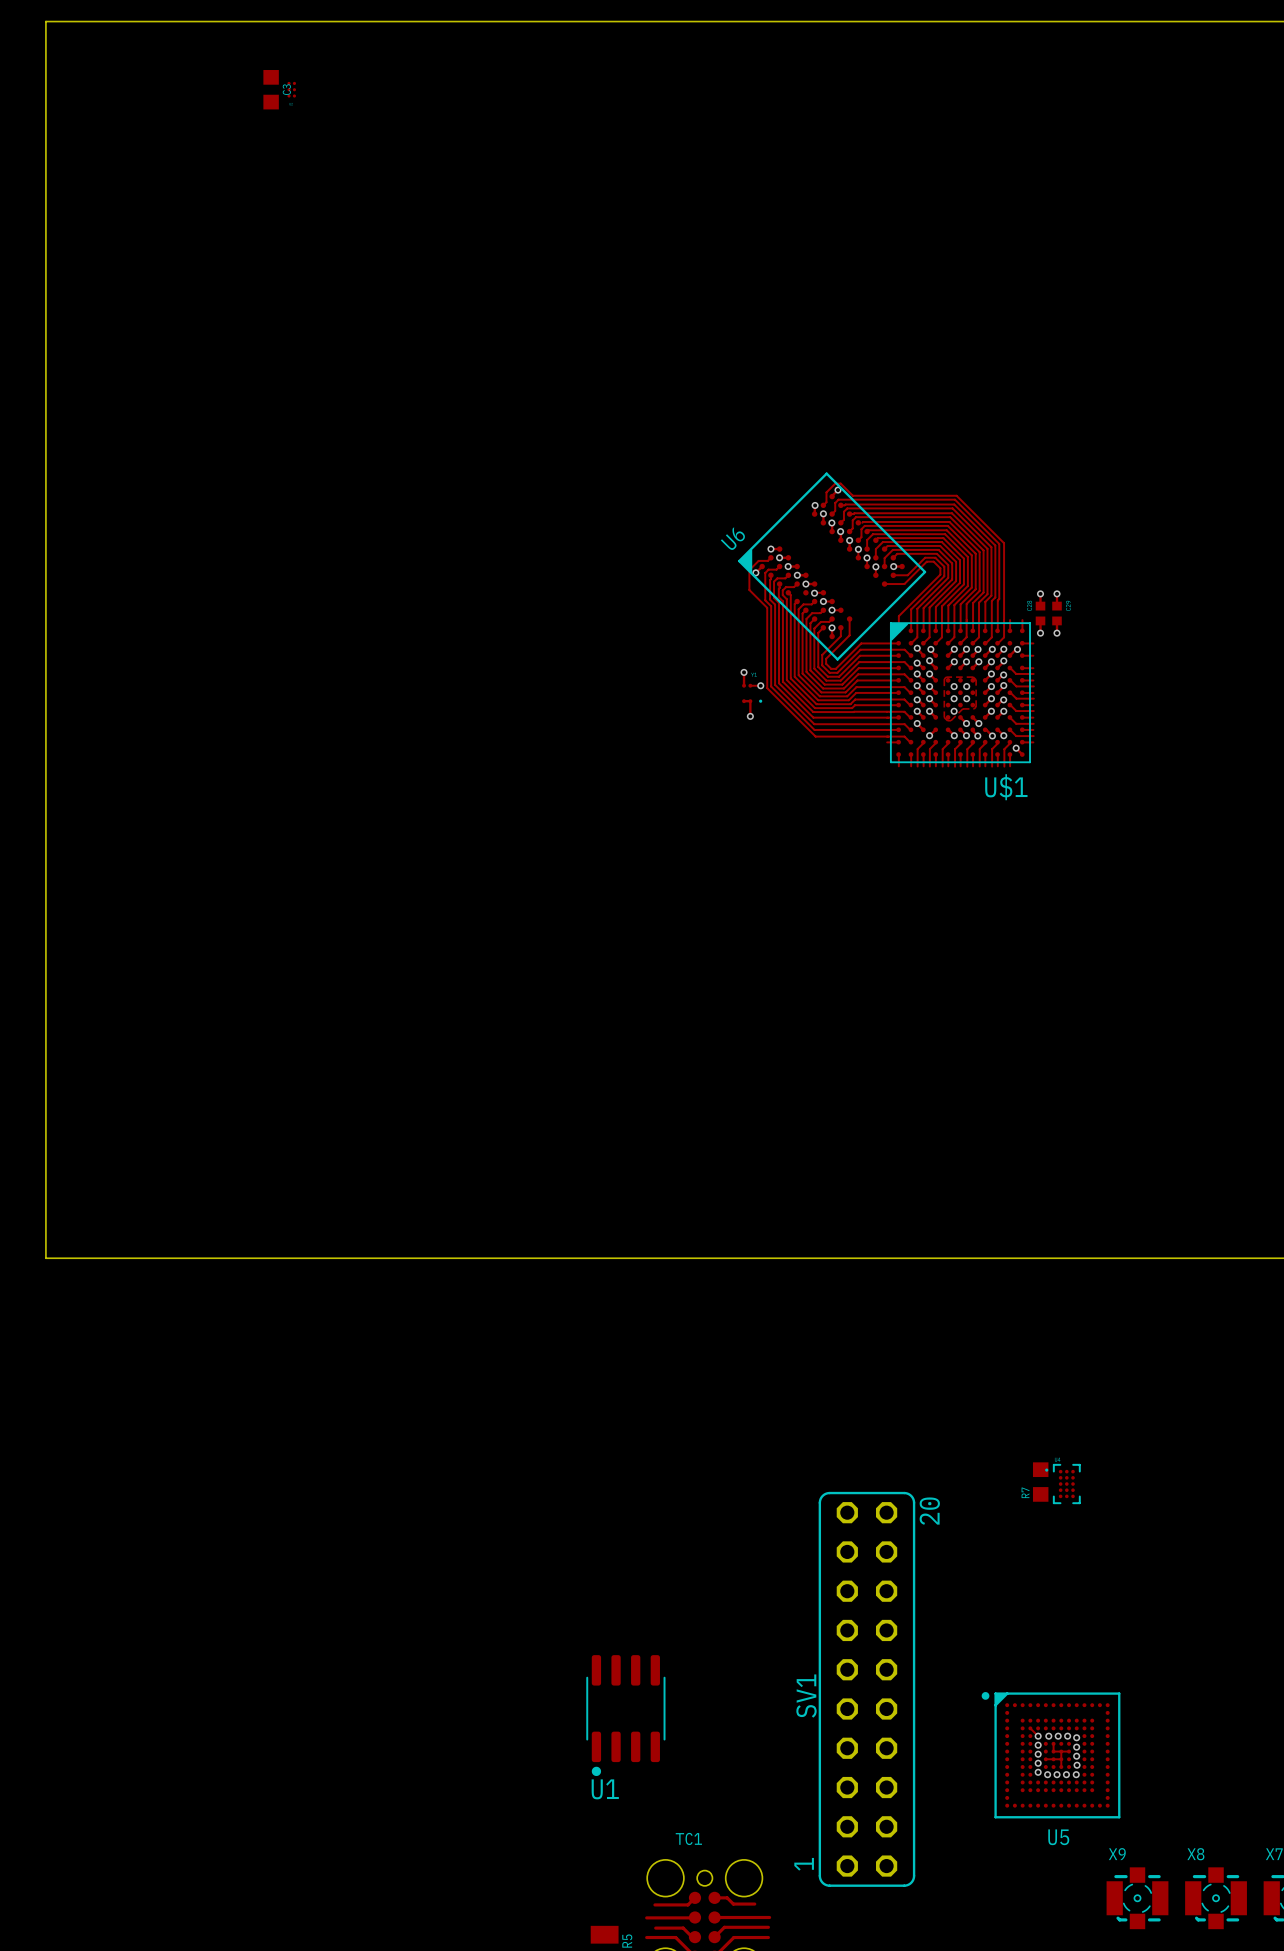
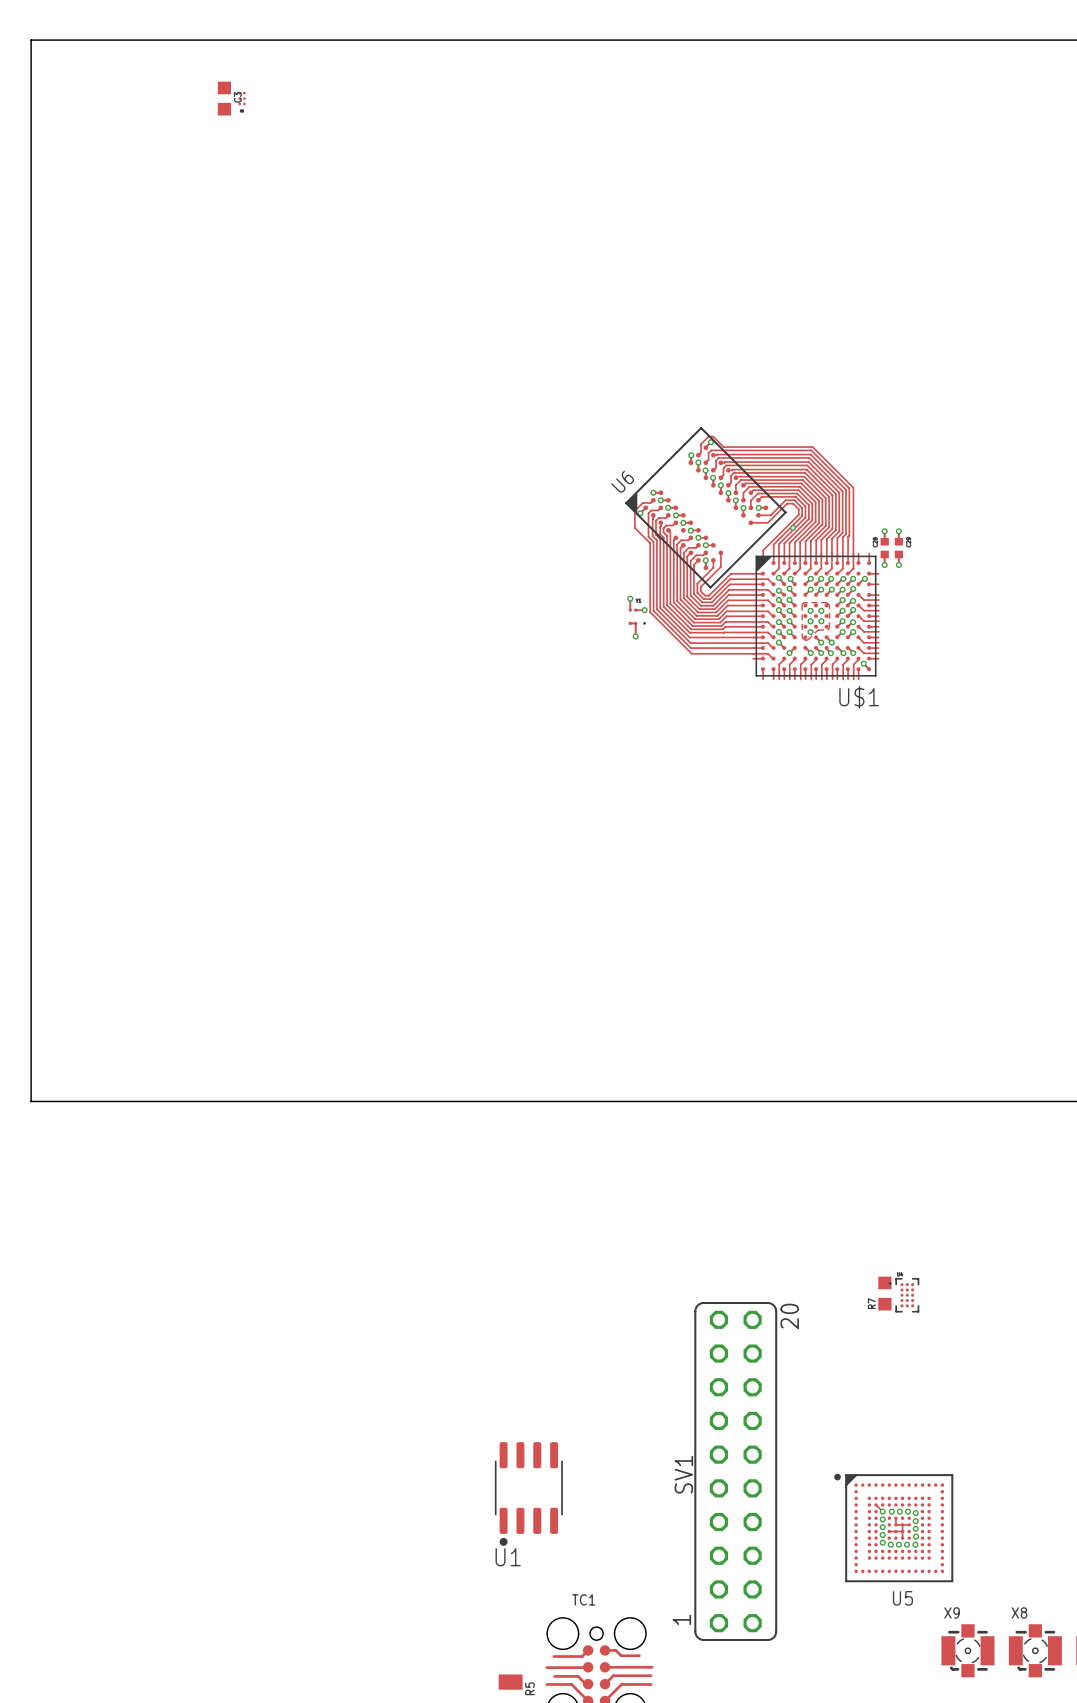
via: none -> (793, 527)

